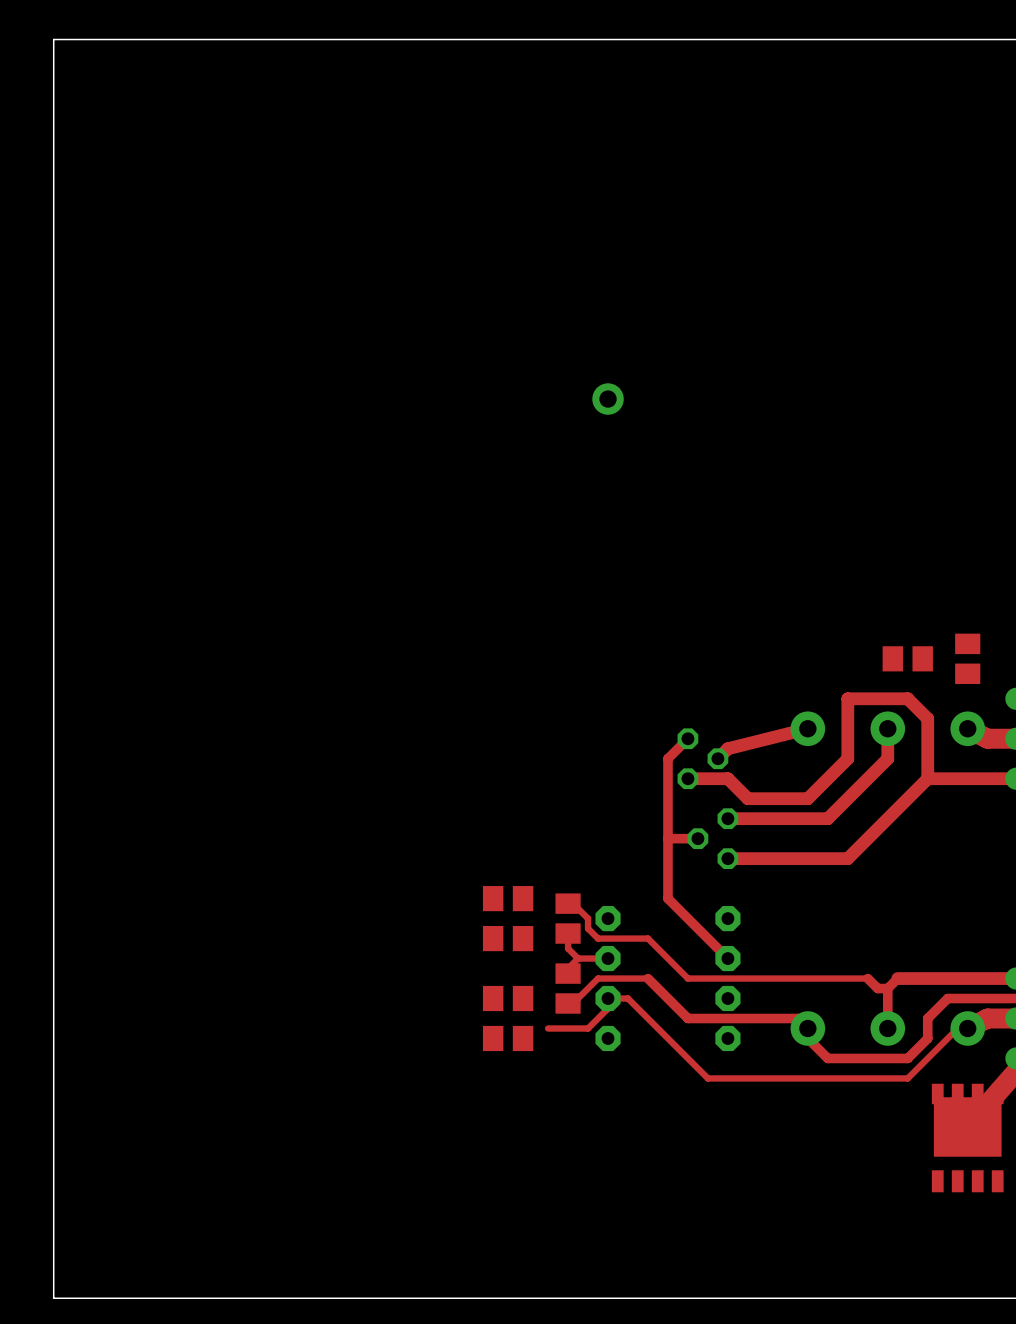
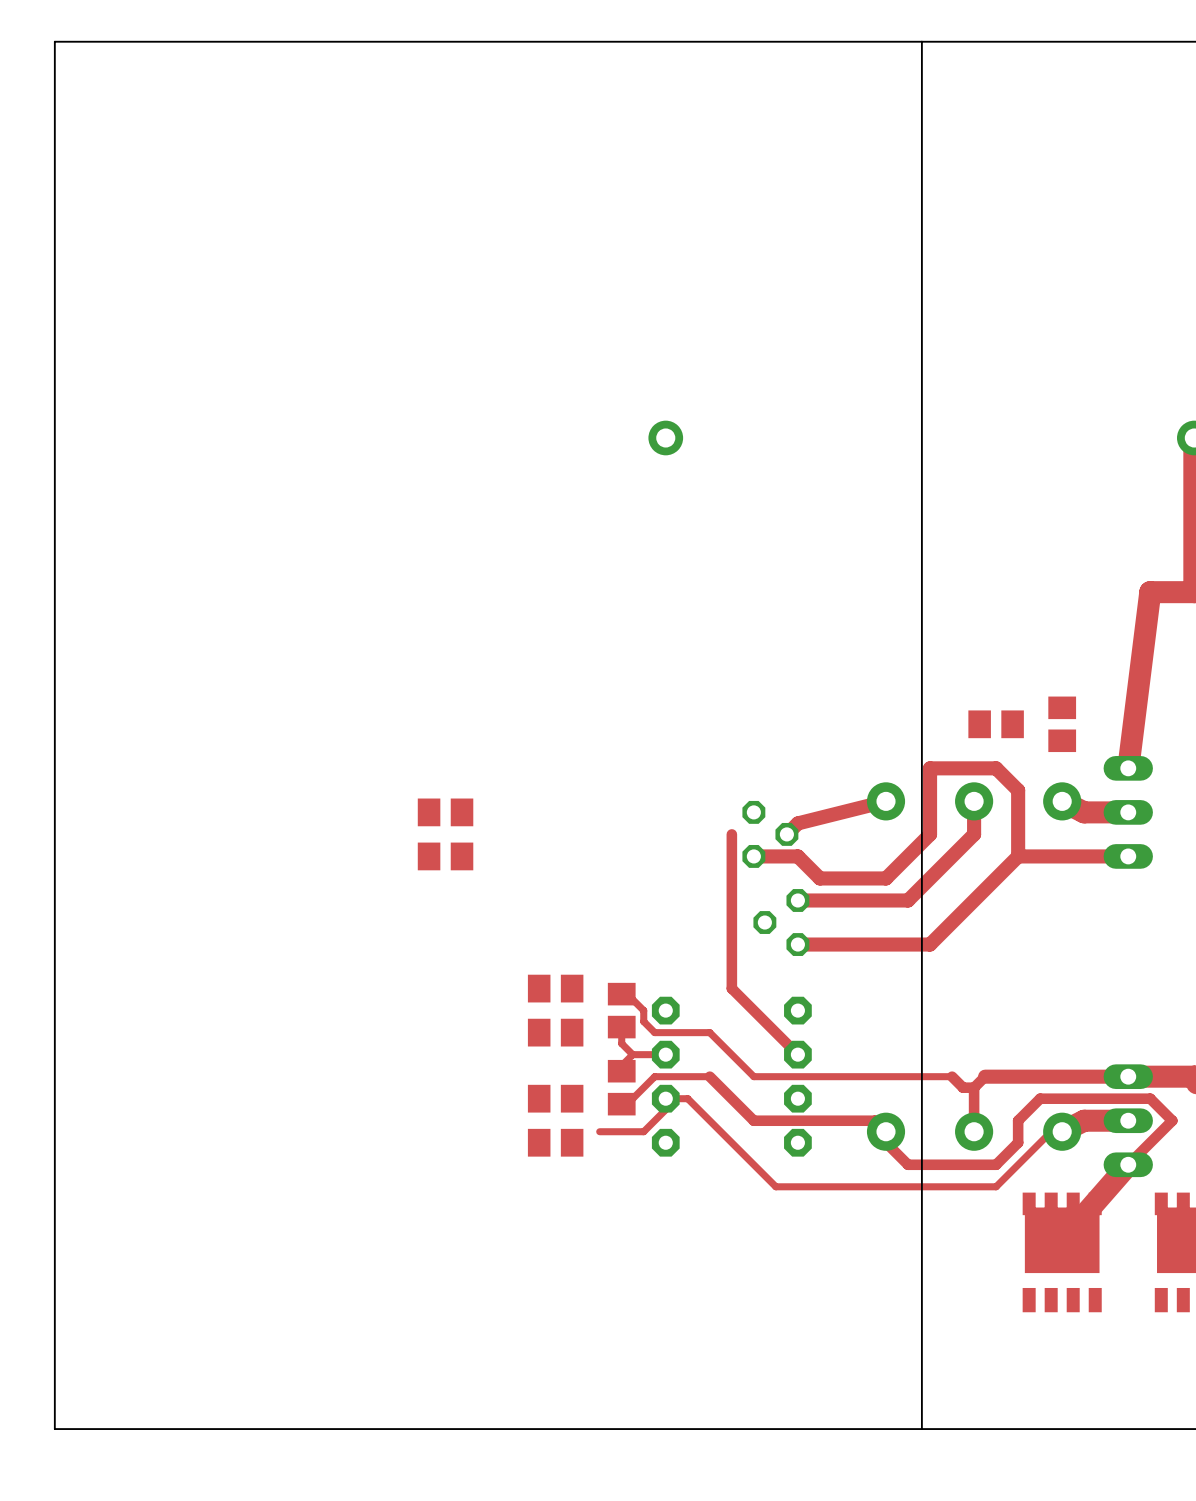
board edge: none -> (921, 41) (921, 1429)
part: none -> (445, 812)
top track: (687, 738) (667, 758) -> none
part: none -> (445, 856)
top track: (697, 838) (667, 838) -> none

